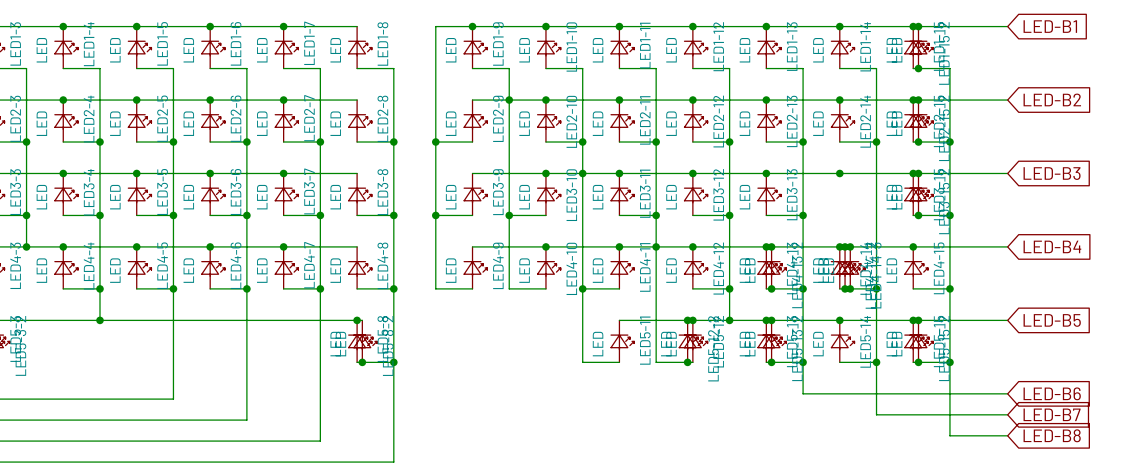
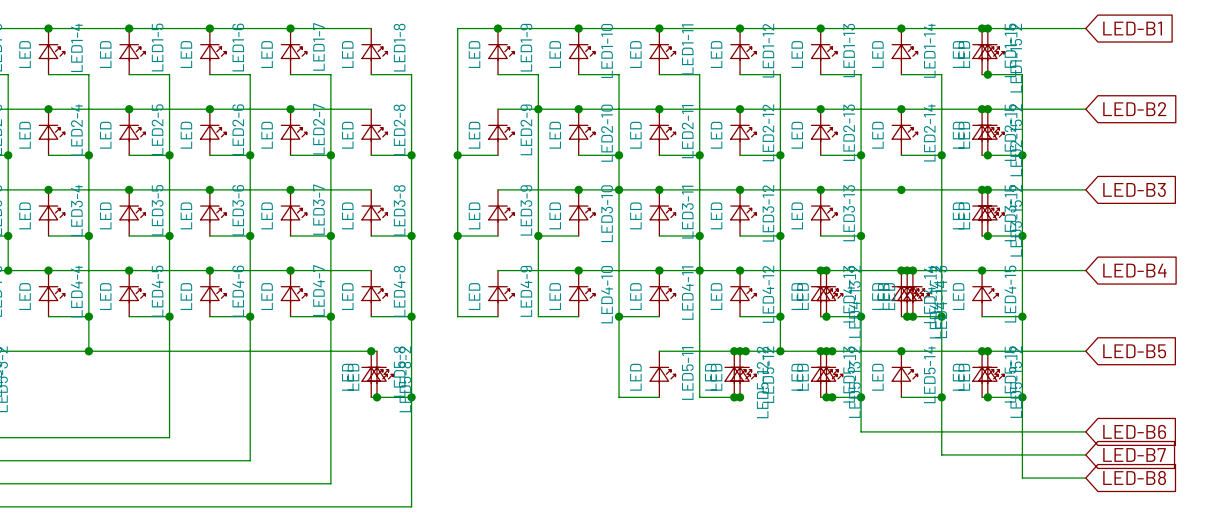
junction: none -> (745, 351)
junction: none -> (832, 351)
junction: none -> (740, 397)
junction: none -> (832, 397)

